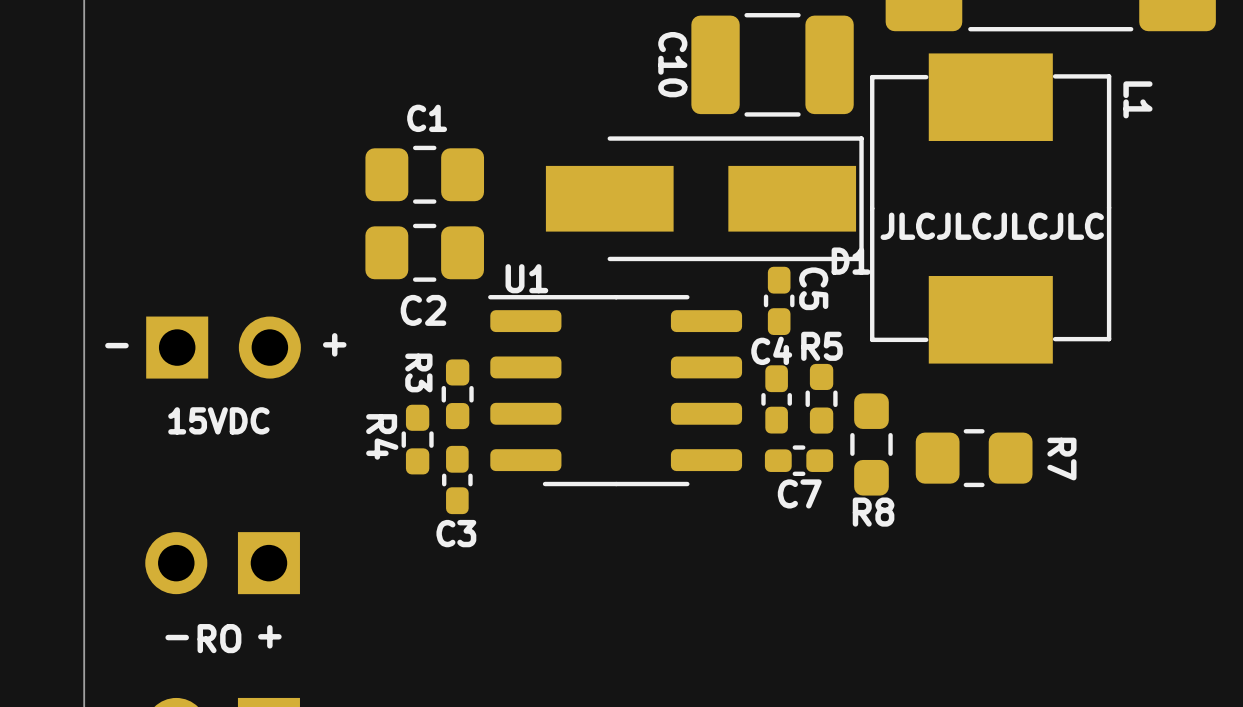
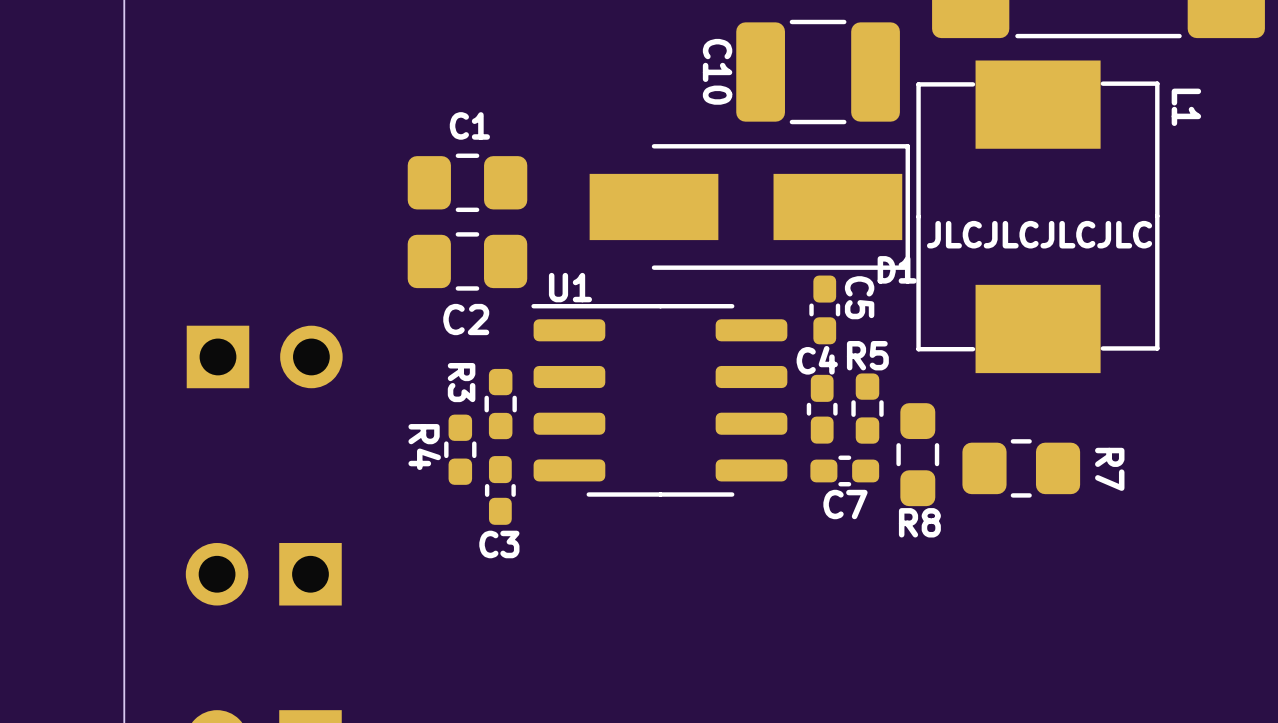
text: + (334, 344) -> none
text: - (116, 345) -> none
text: 15VDC (218, 420) -> none
text: + (269, 636) -> none
text: - (177, 637) -> none
text: RO (219, 638) -> none

